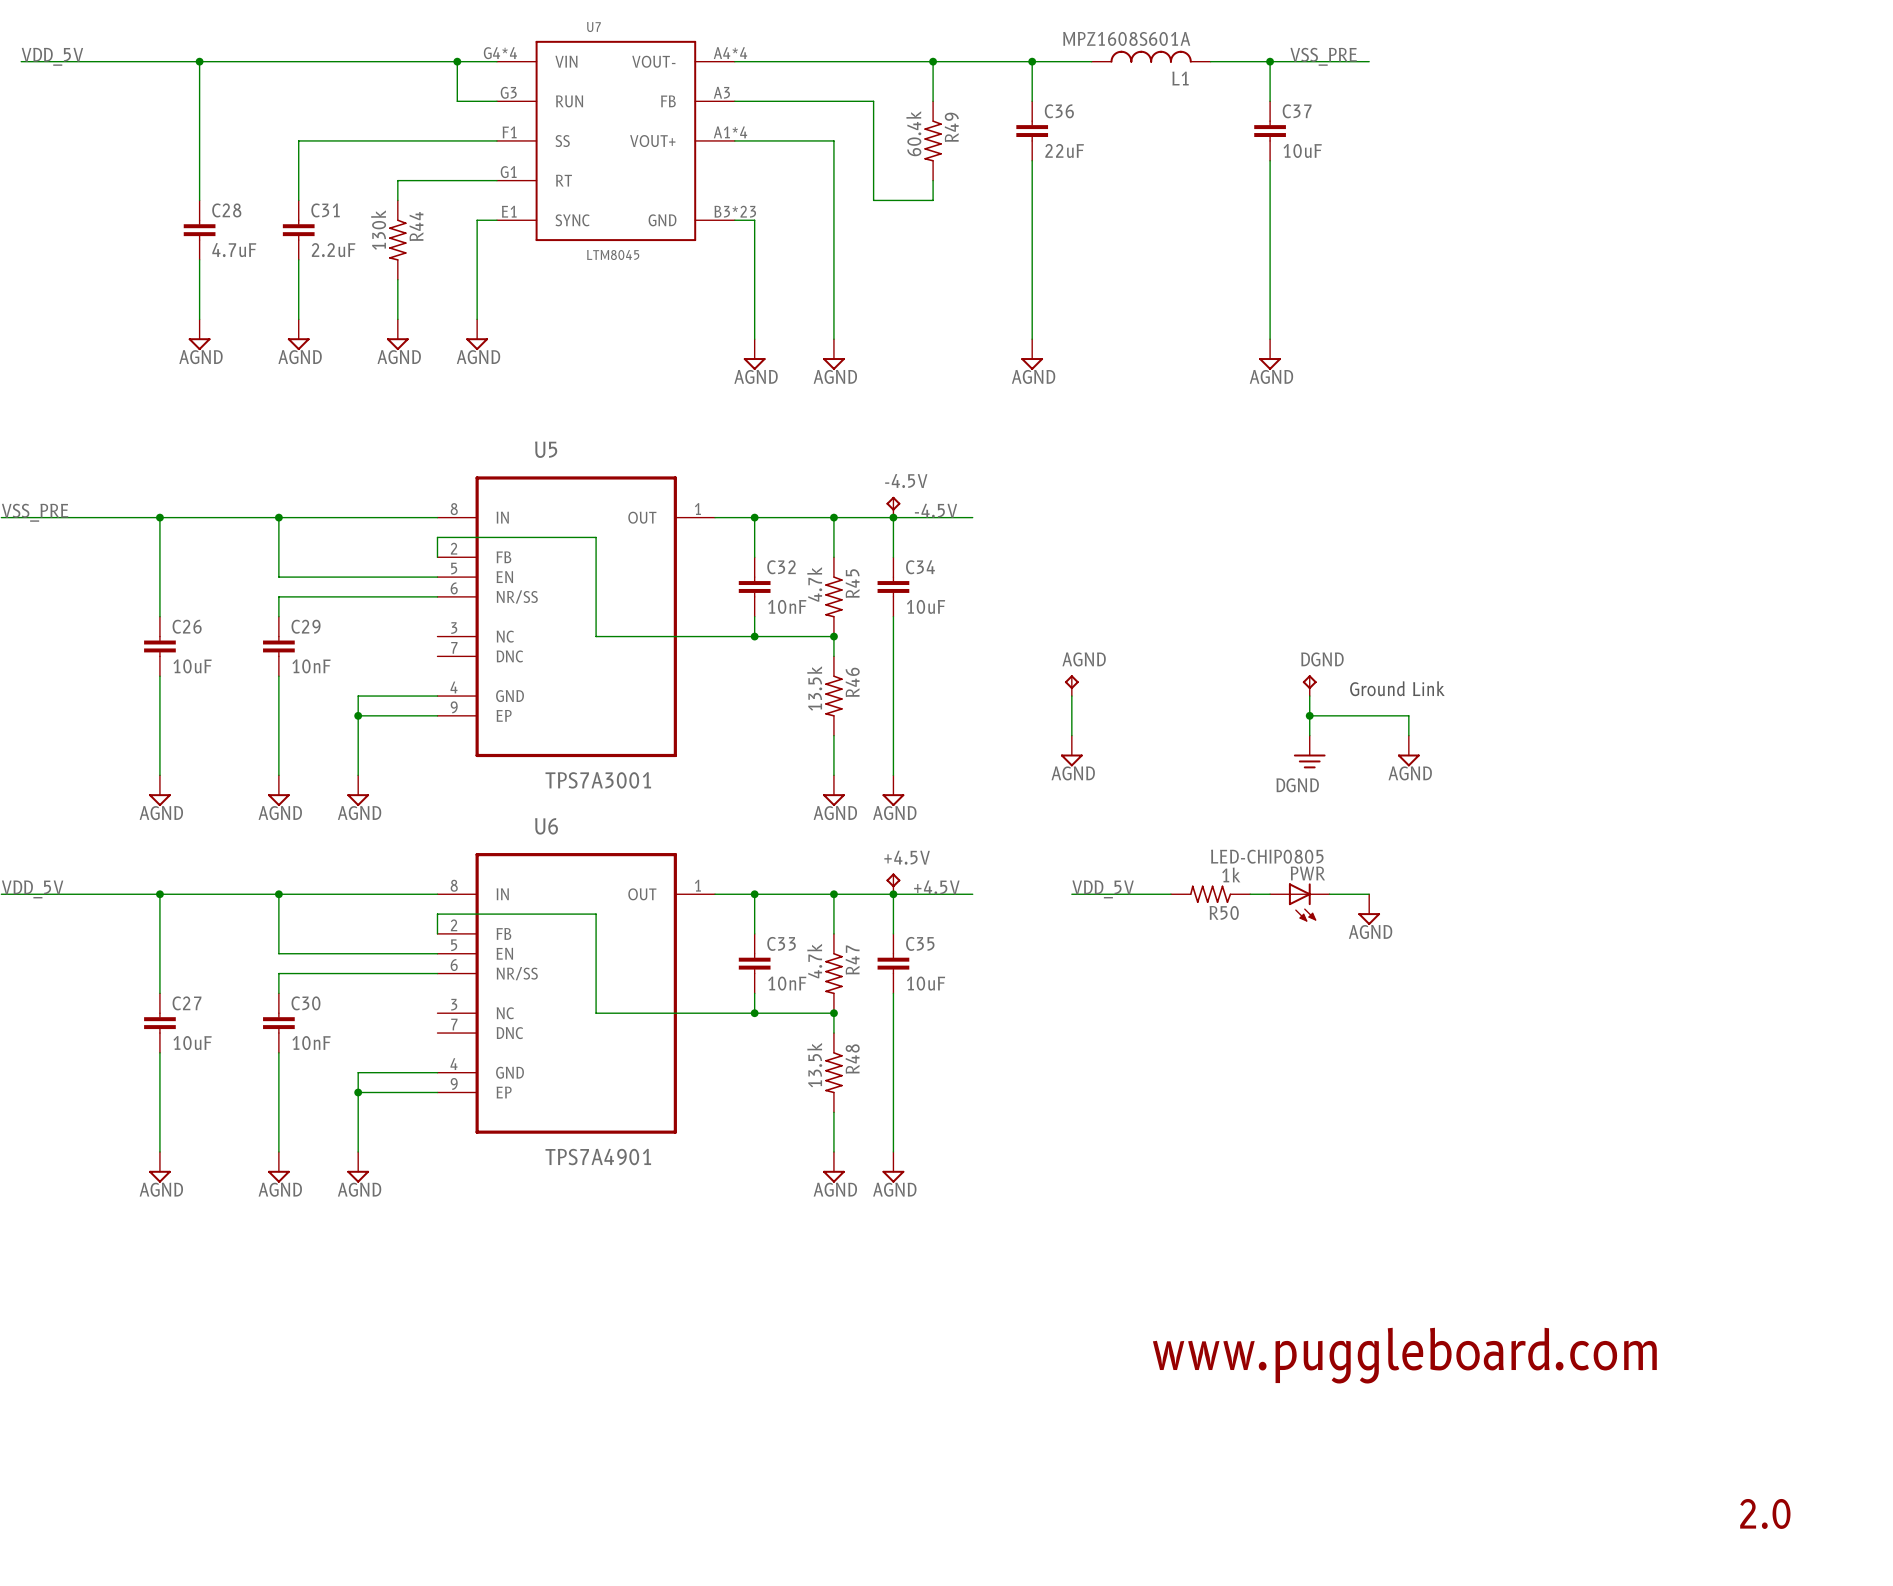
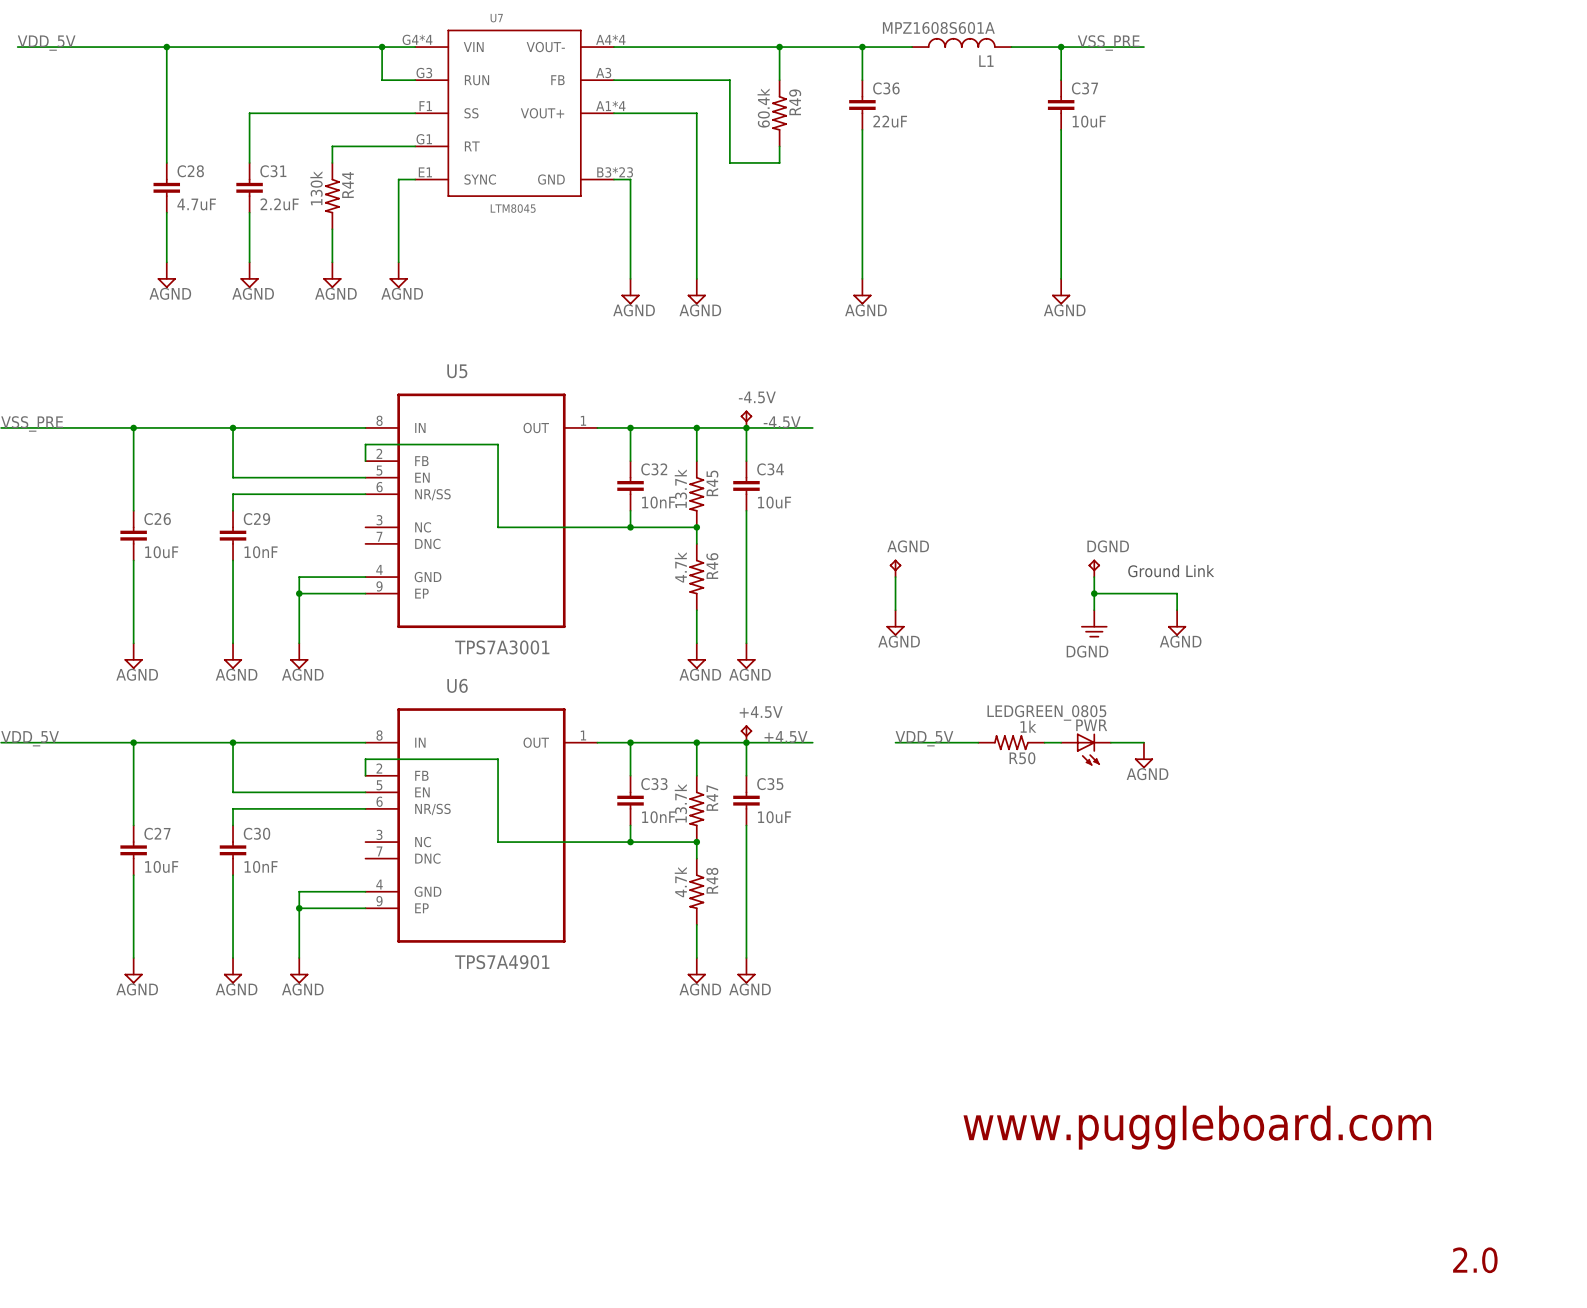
R45 value: 4.7k (814, 584) -> 13.7k (680, 488)
R46 value: 13.5k (814, 688) -> 4.7k (680, 567)
PWR value: LED-CHIP0805 (1267, 856) -> LEDGREEN_0805 (1046, 712)
R47 value: 4.7k (814, 961) -> 13.7k (680, 803)
R48 value: 13.5k (814, 1065) -> 4.7k (680, 882)

